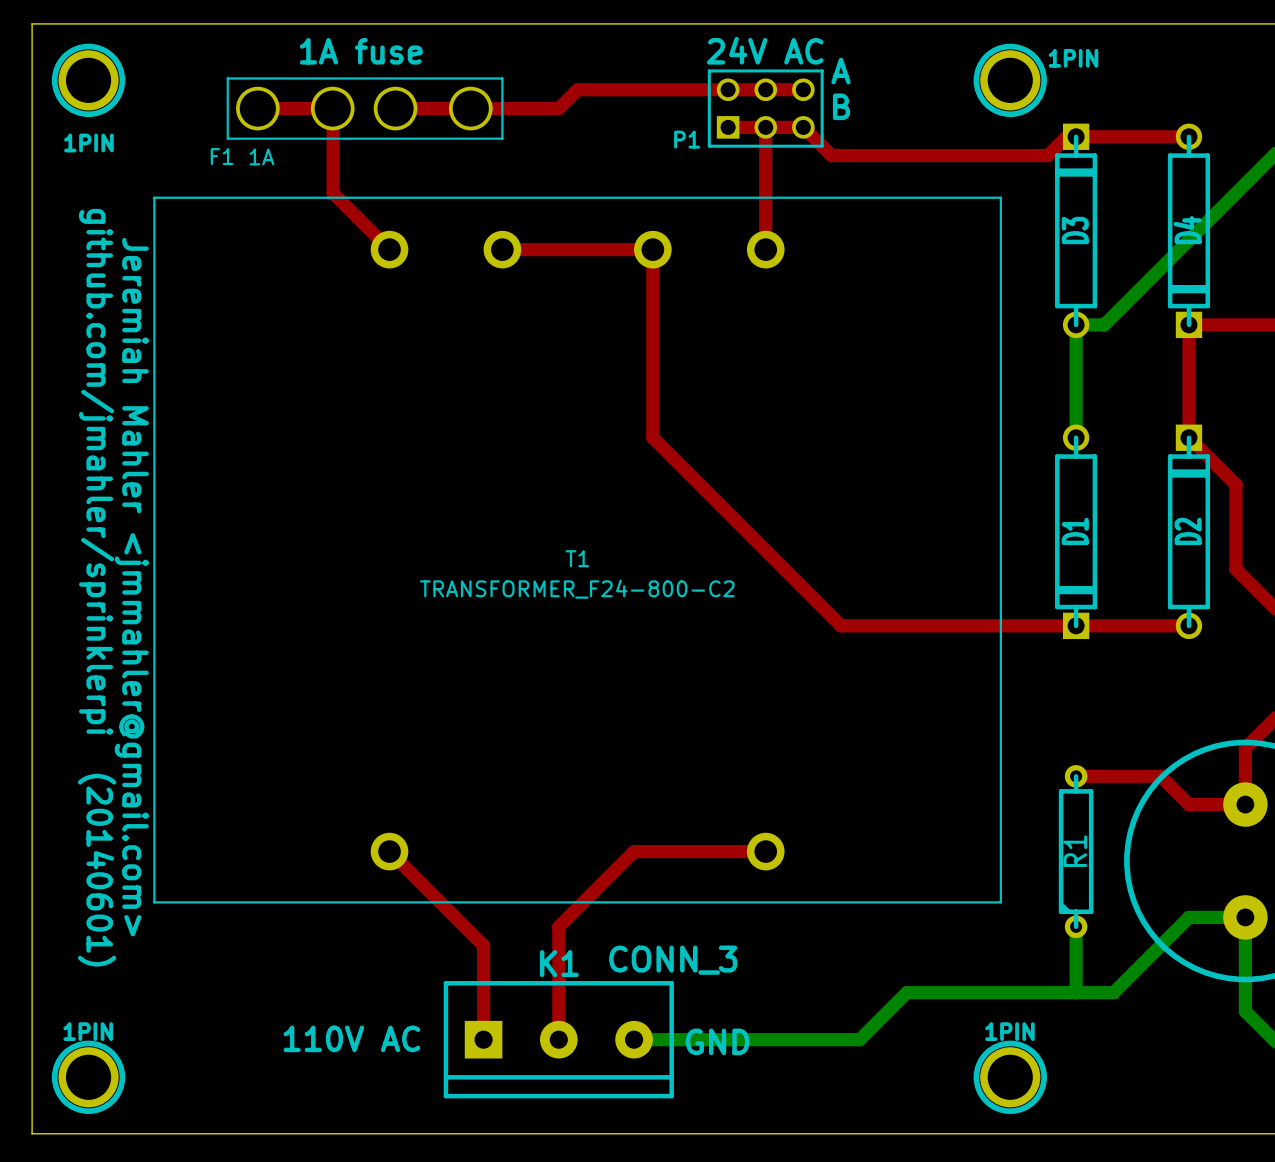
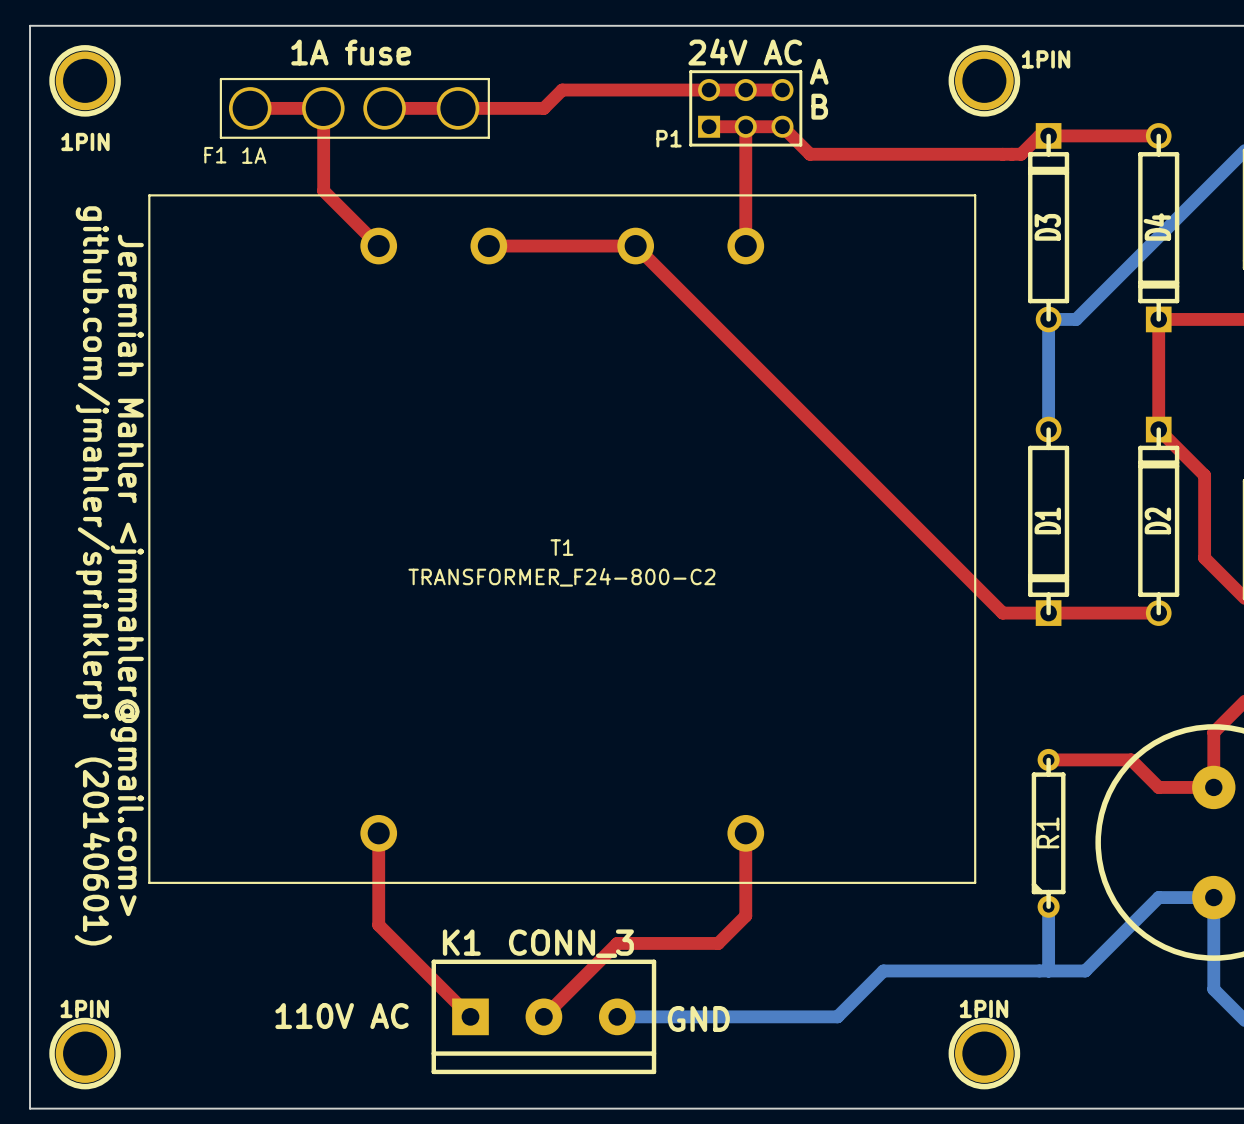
top track: (652, 249) (652, 437) (840, 625) (1029, 625) -> (635, 246) (1002, 613)
top track: (389, 851) (483, 945) (483, 1039) -> (378, 833) (378, 925) (470, 1016)
top track: (765, 851) (634, 851) (558, 926) (558, 1039) -> (745, 833) (745, 915) (718, 943) (617, 943) (543, 1016)
K1 value position: CONN_3 (673, 960) -> CONN_3 (571, 943)
K1 name position: K1 (559, 963) -> K1 (461, 942)

